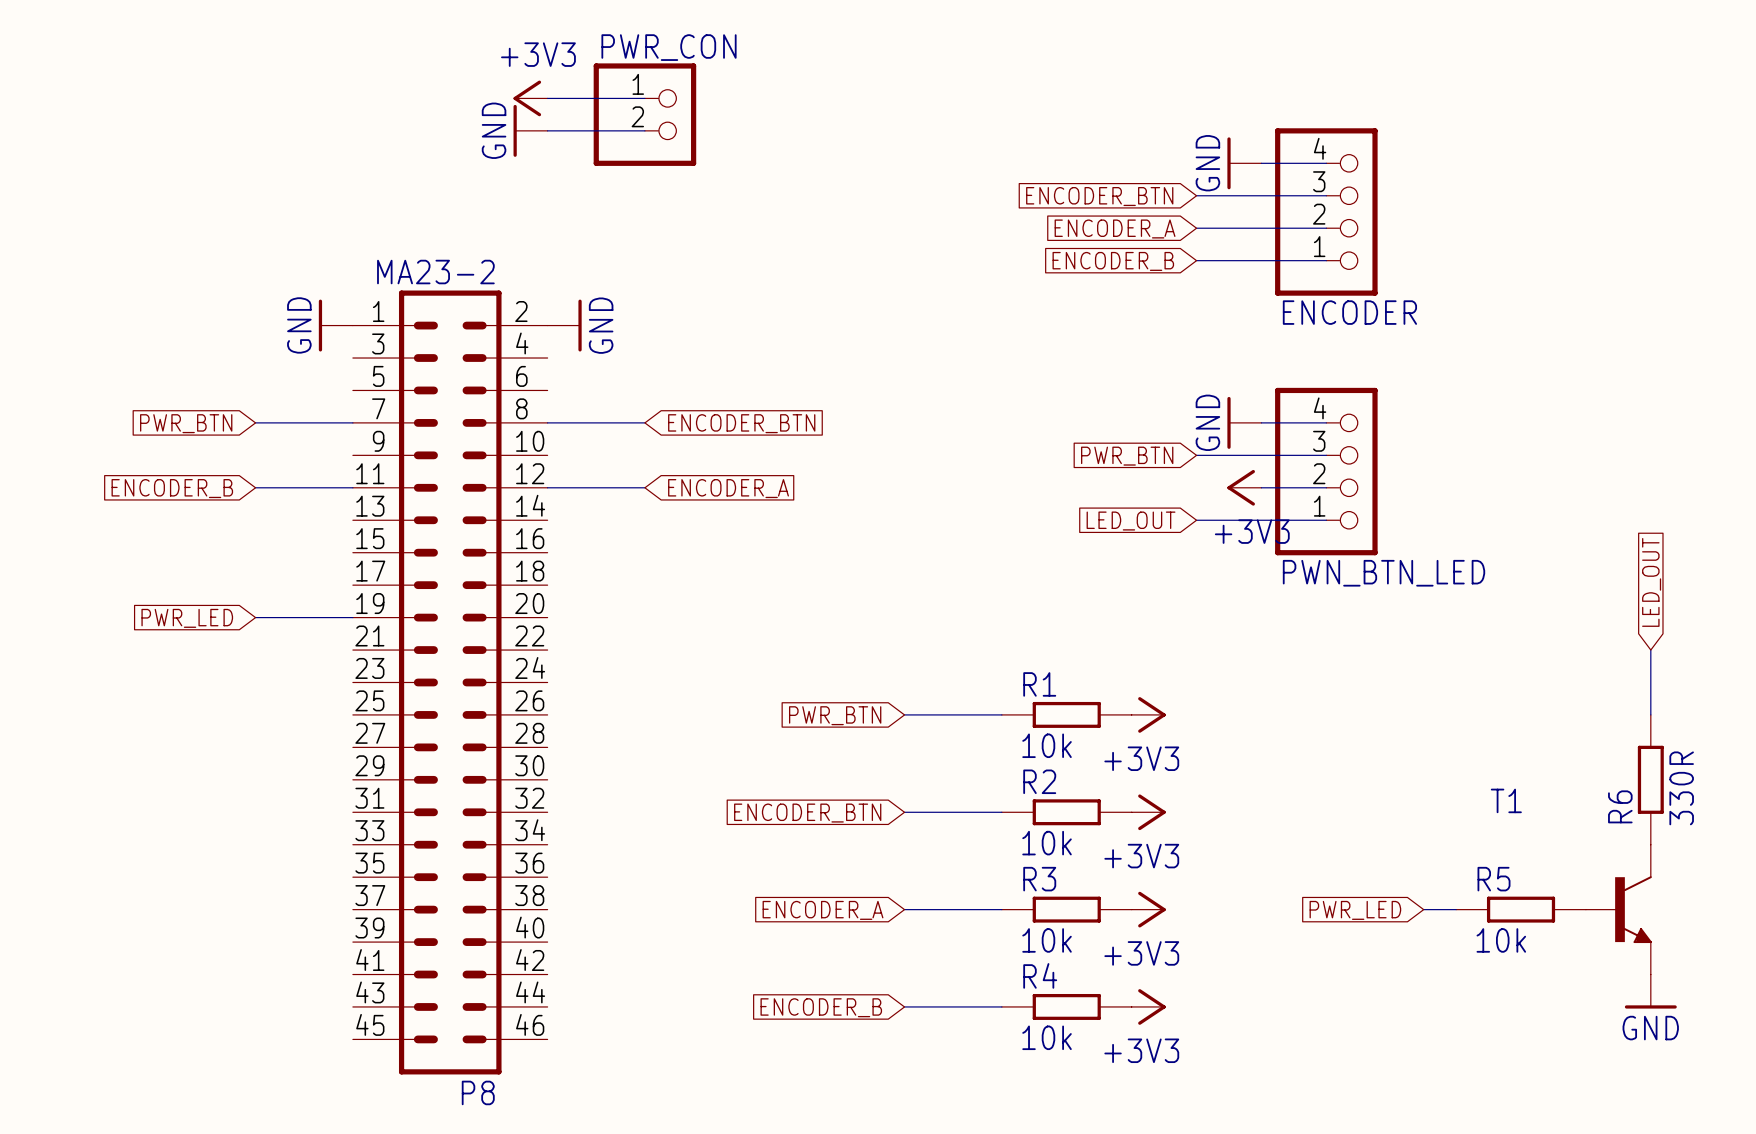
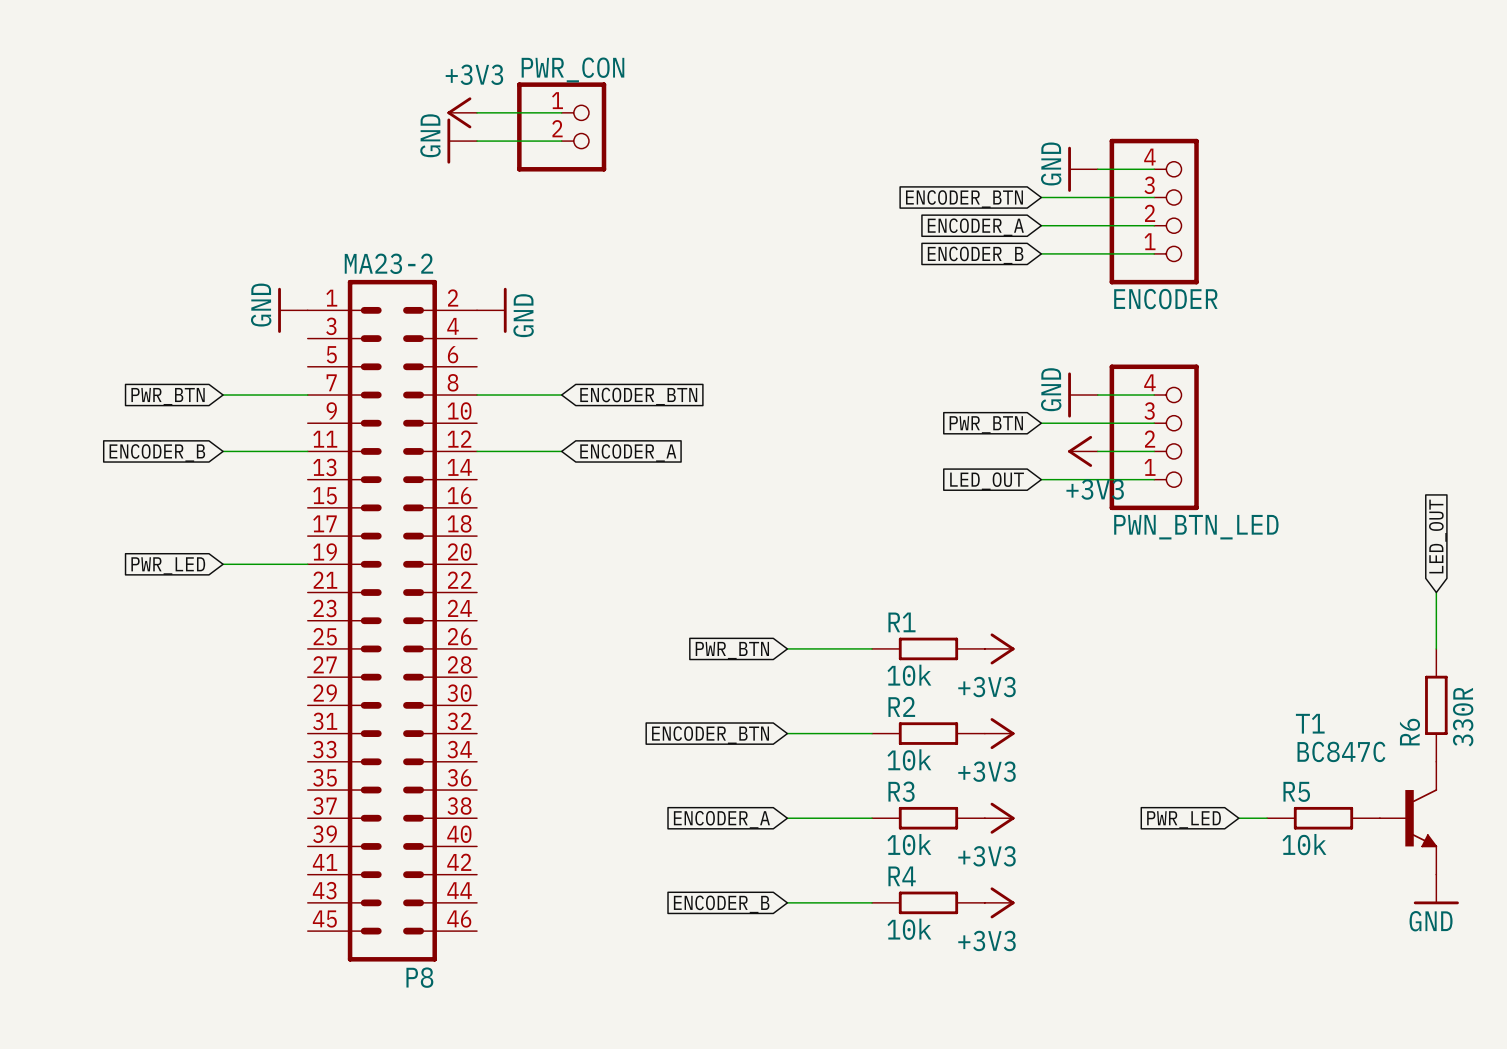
T1 value: none -> BC847C (1341, 751)

